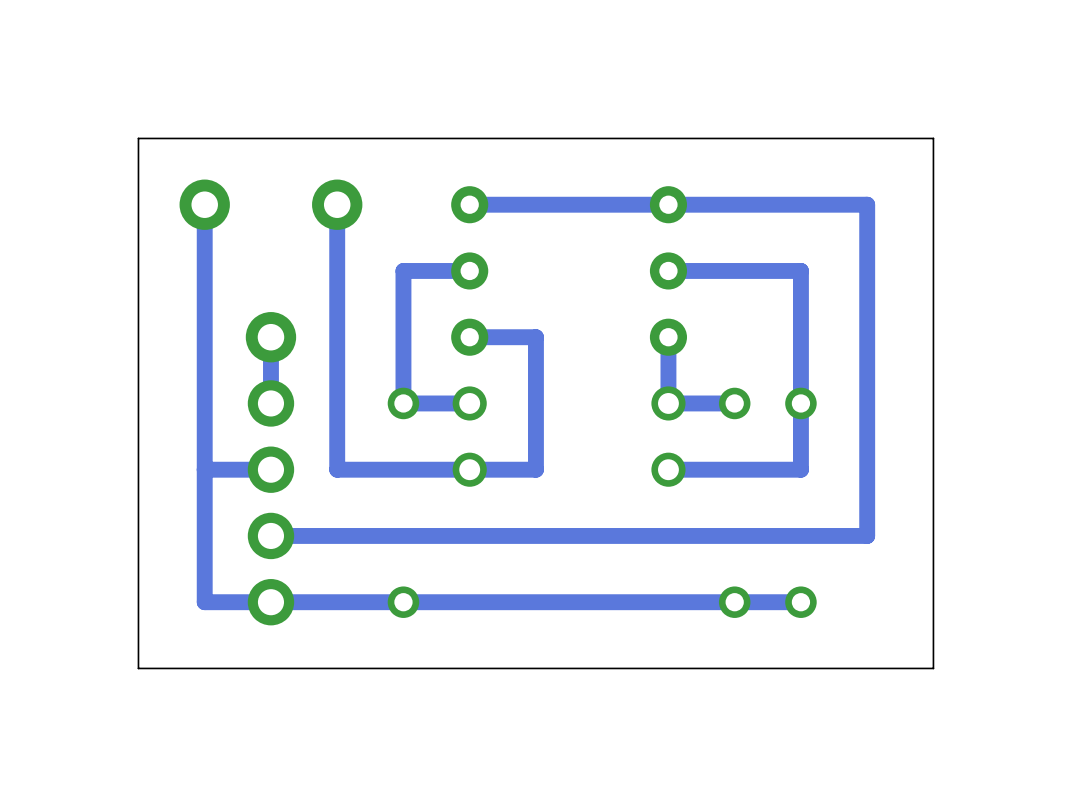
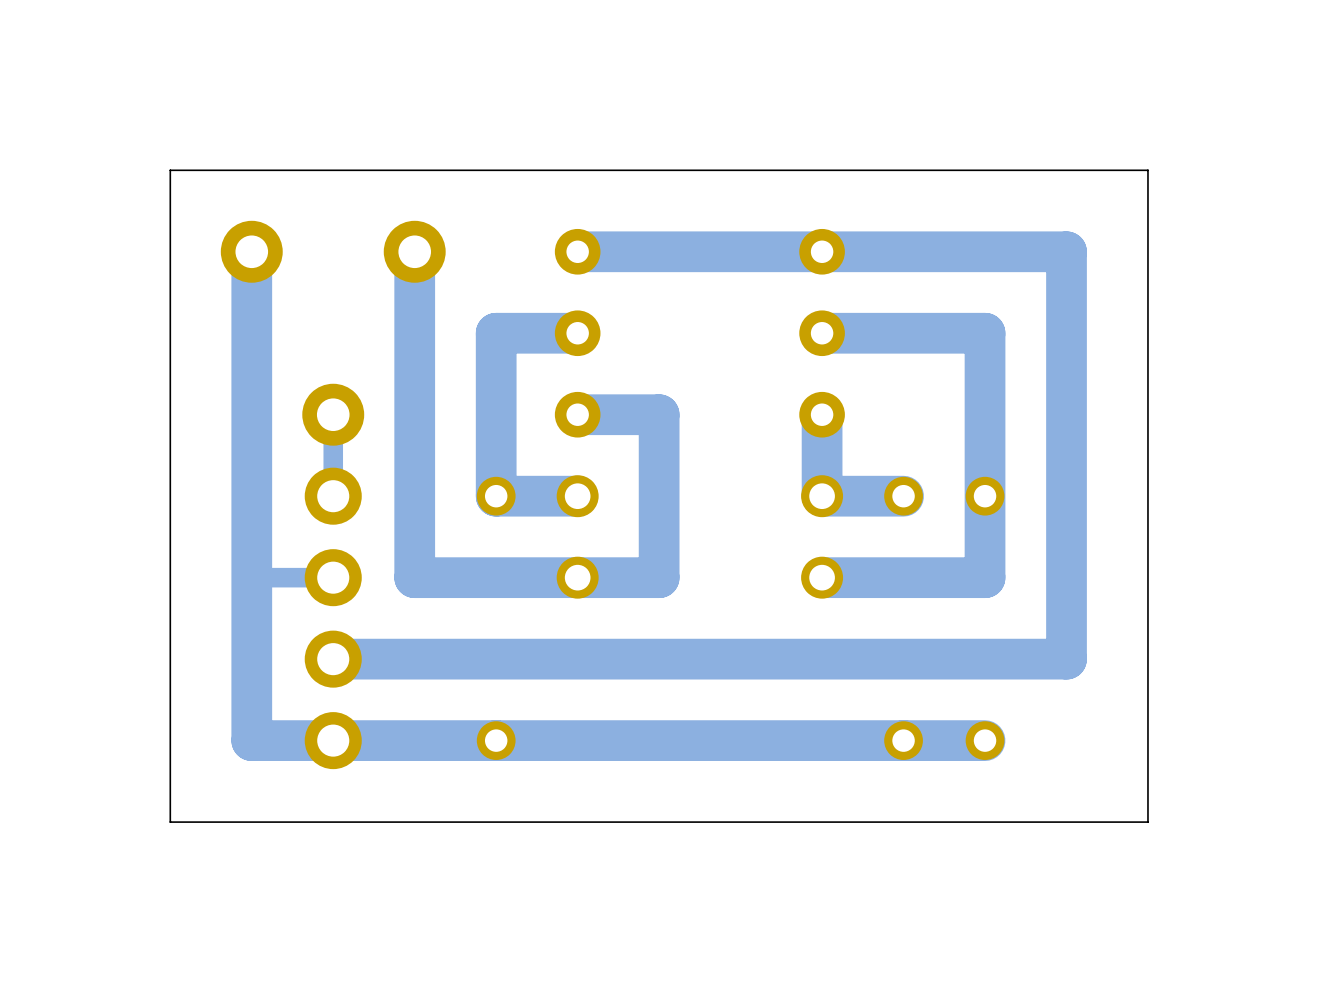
track width: thin (204, 204) (204, 602) (800, 602) -> thick (251, 251) (251, 740) (985, 740)
track width: thin (337, 204) (337, 469) (535, 469) (535, 337) (469, 337) -> thick (414, 251) (414, 577) (659, 577) (659, 414) (577, 414)
track width: thin (469, 204) (867, 204) (867, 535) (270, 535) -> thick (577, 251) (1066, 251) (1066, 659) (333, 659)
track width: thin (469, 270) (403, 270) (403, 403) (469, 403) -> thick (577, 333) (496, 333) (496, 496) (577, 496)
track width: thin (668, 270) (800, 270) (800, 469) (668, 469) -> thick (822, 333) (985, 333) (985, 577) (822, 577)
track width: thin (668, 337) (668, 403) (734, 403) -> thick (822, 414) (822, 496) (903, 496)

